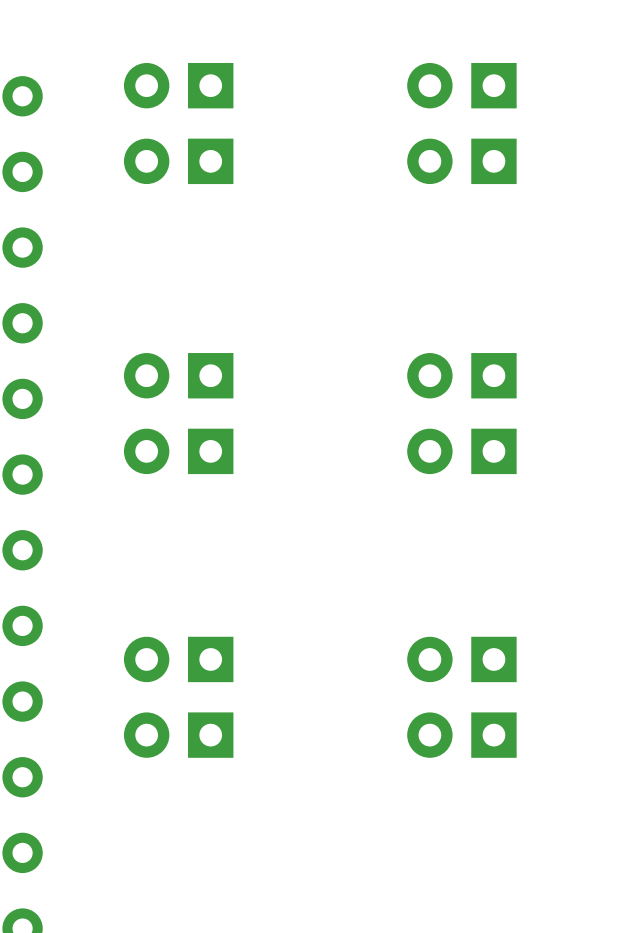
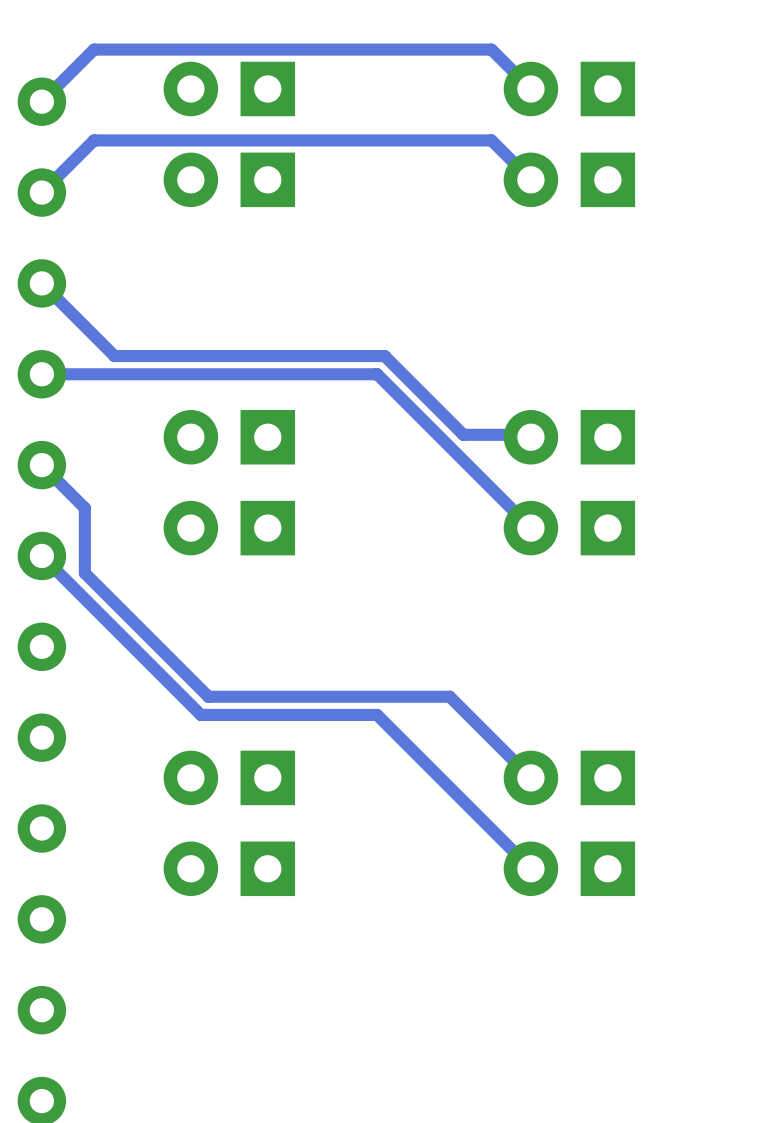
track: none -> (530, 88) (491, 49) (94, 49) (41, 101)
track: none -> (530, 179) (491, 140) (94, 140) (41, 192)
track: none -> (41, 283) (114, 356) (384, 356) (463, 434) (528, 434) (530, 437)
track: none -> (41, 374) (377, 374) (530, 528)
track: none -> (41, 465) (84, 508) (84, 573) (208, 696) (449, 696) (530, 777)
track: none -> (41, 555) (200, 714) (377, 714) (530, 868)

